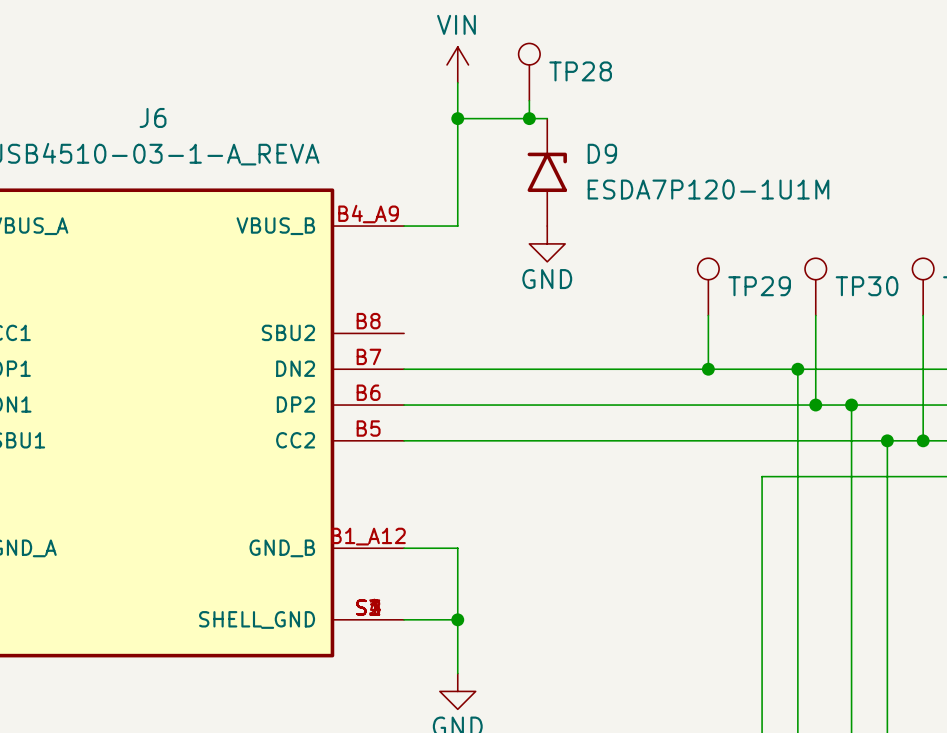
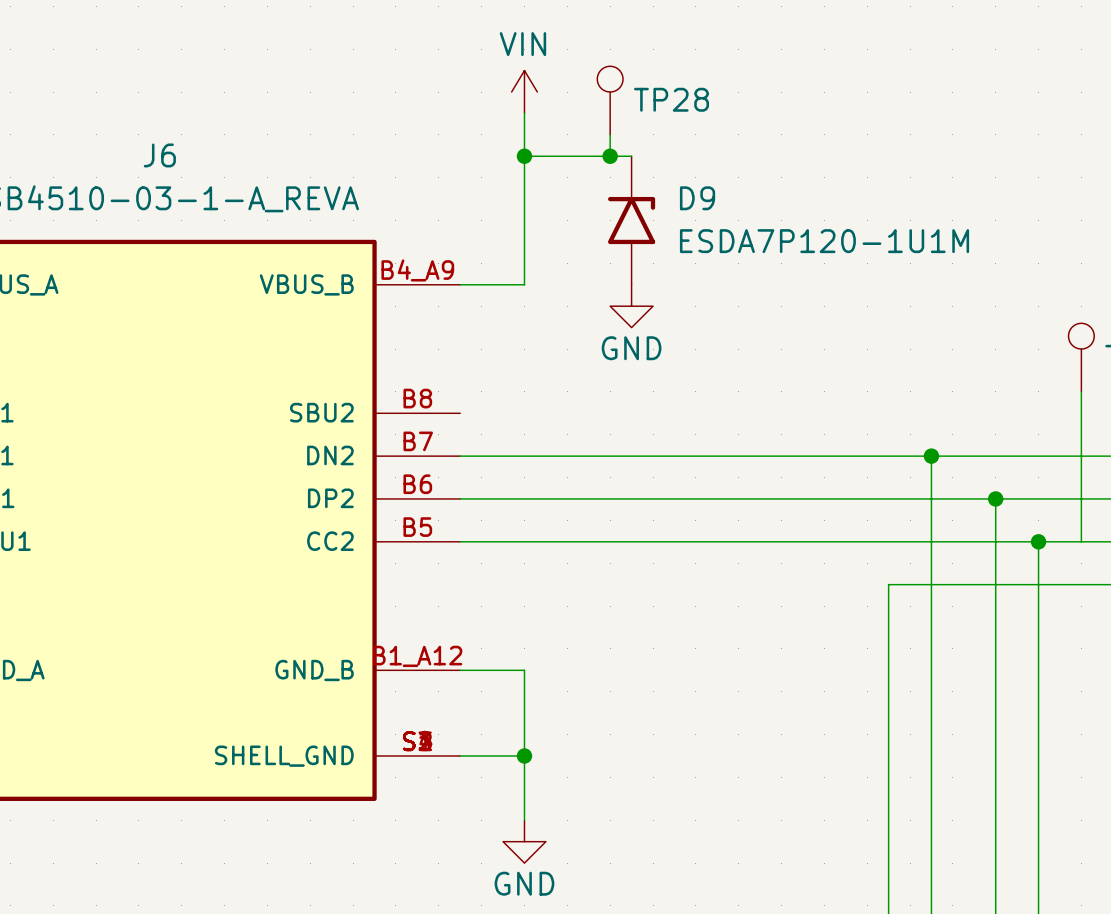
TP29: (708, 286) -> none
TP30: (815, 286) -> none
wire: (708, 315) (708, 369) -> none
wire: (815, 315) (815, 405) -> none
junction: (708, 369) -> none
junction: (815, 405) -> none
junction: (923, 440) -> none

